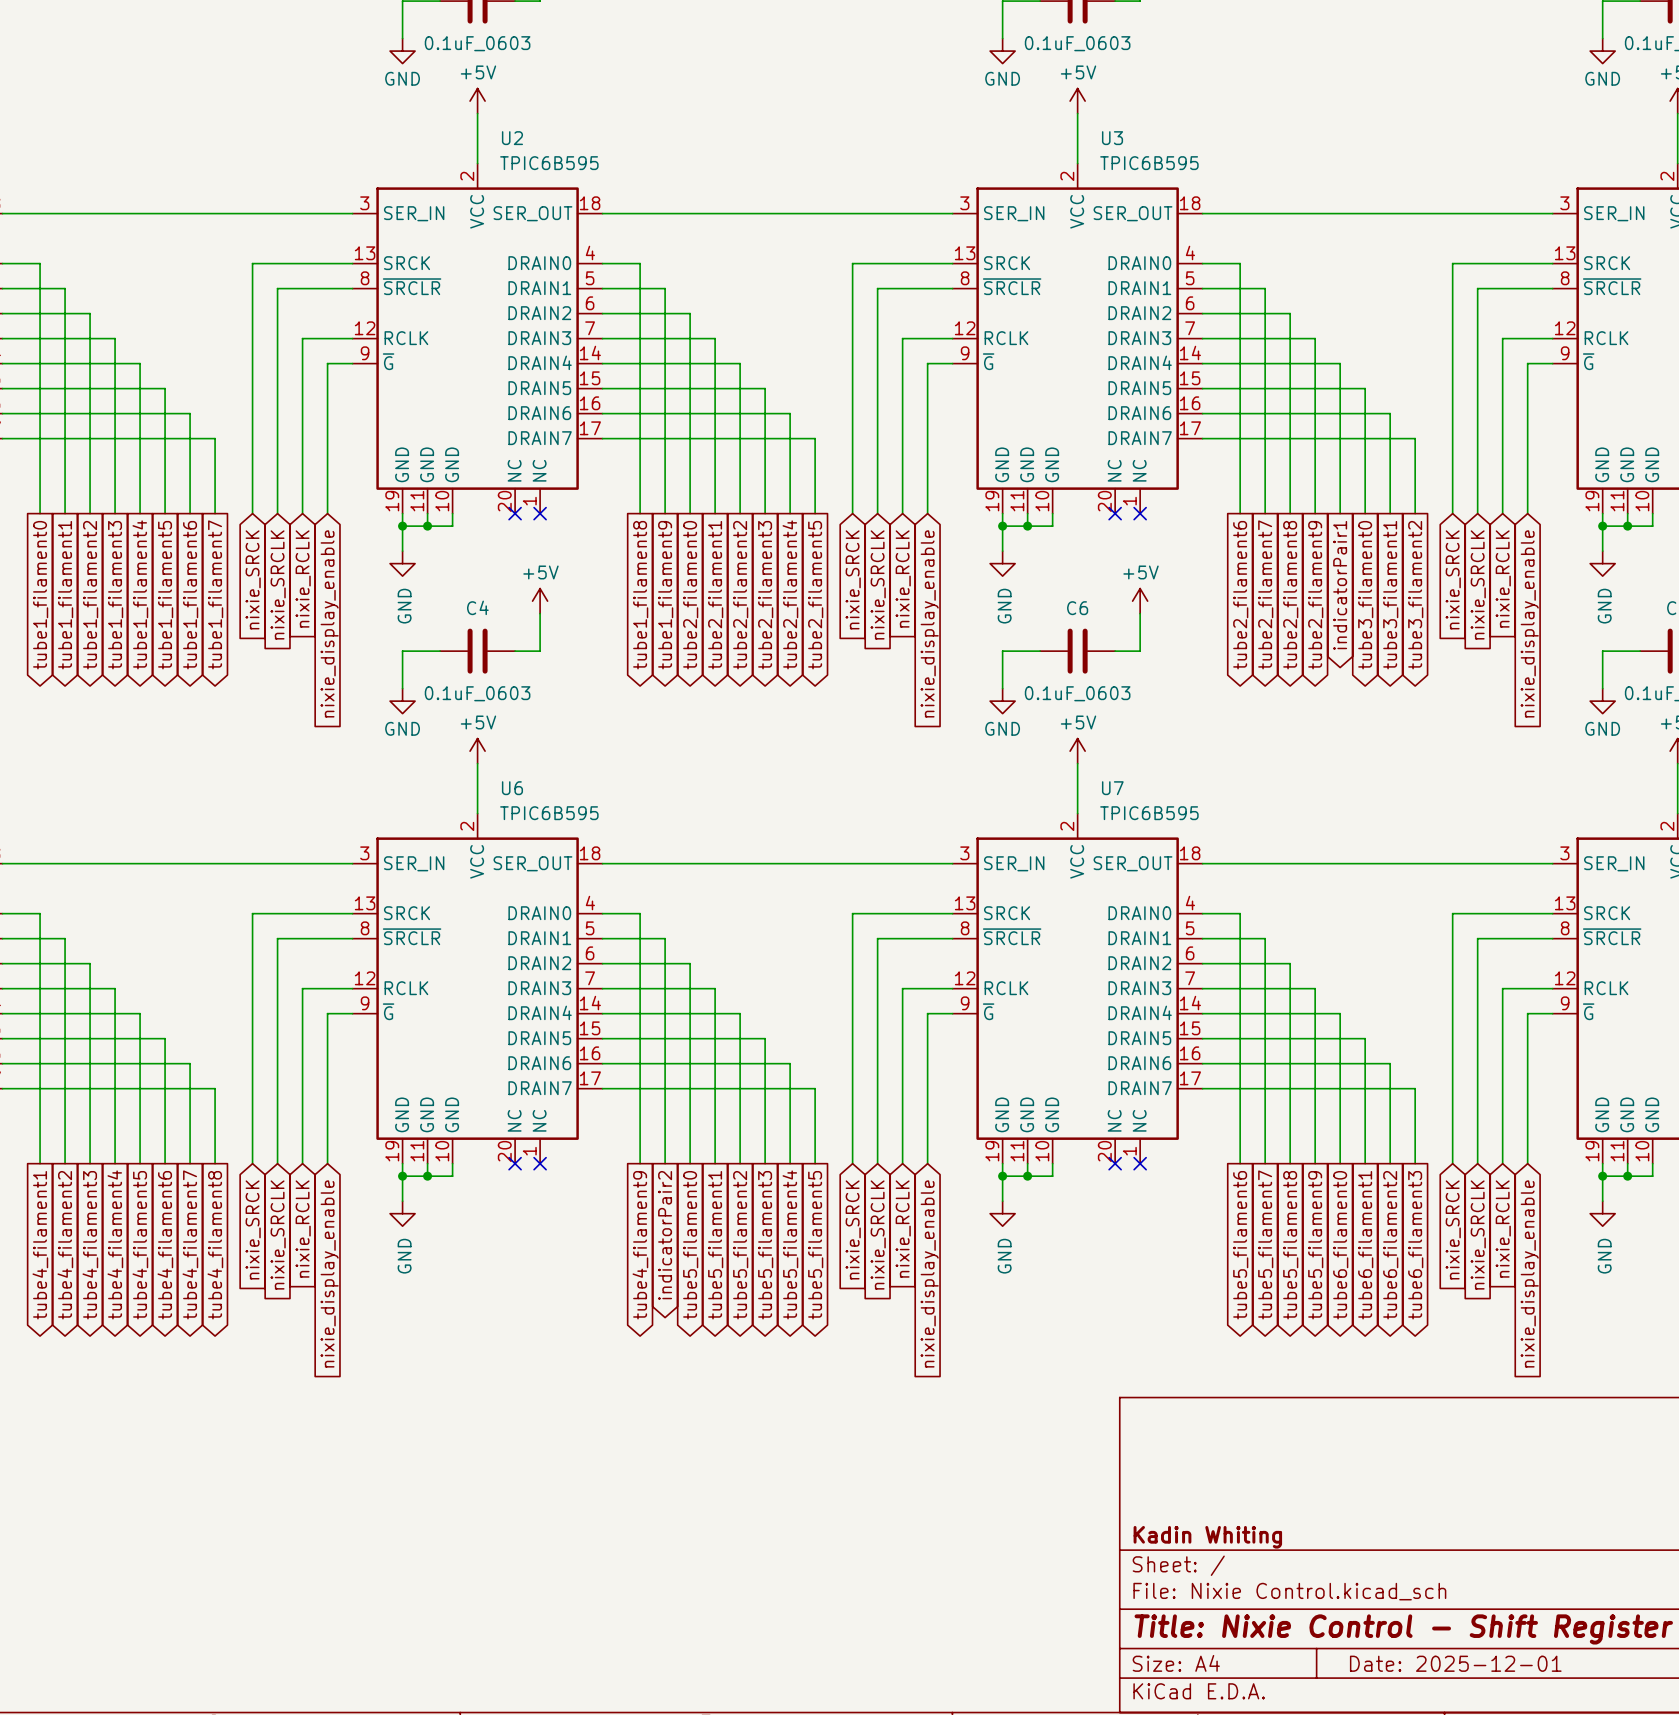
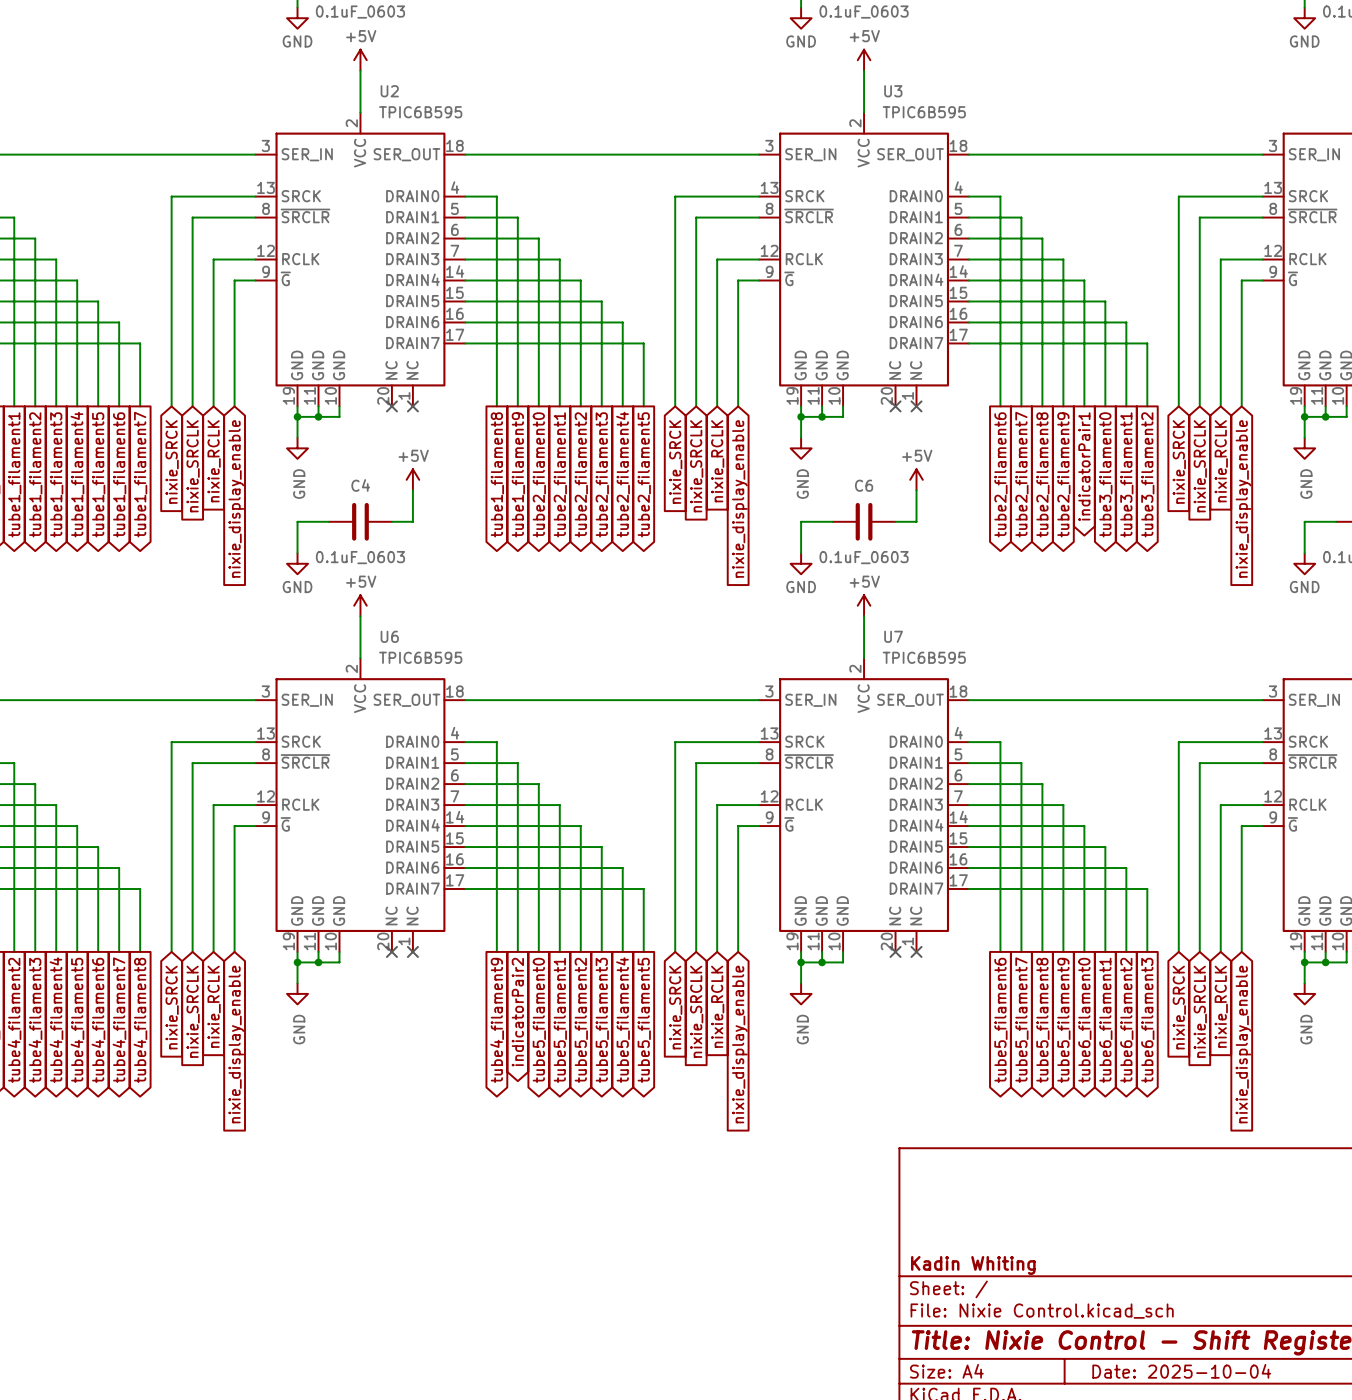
title block: Date: 2025-12-01 (1455, 1663) -> Date: 2025-10-04 (1181, 1371)

